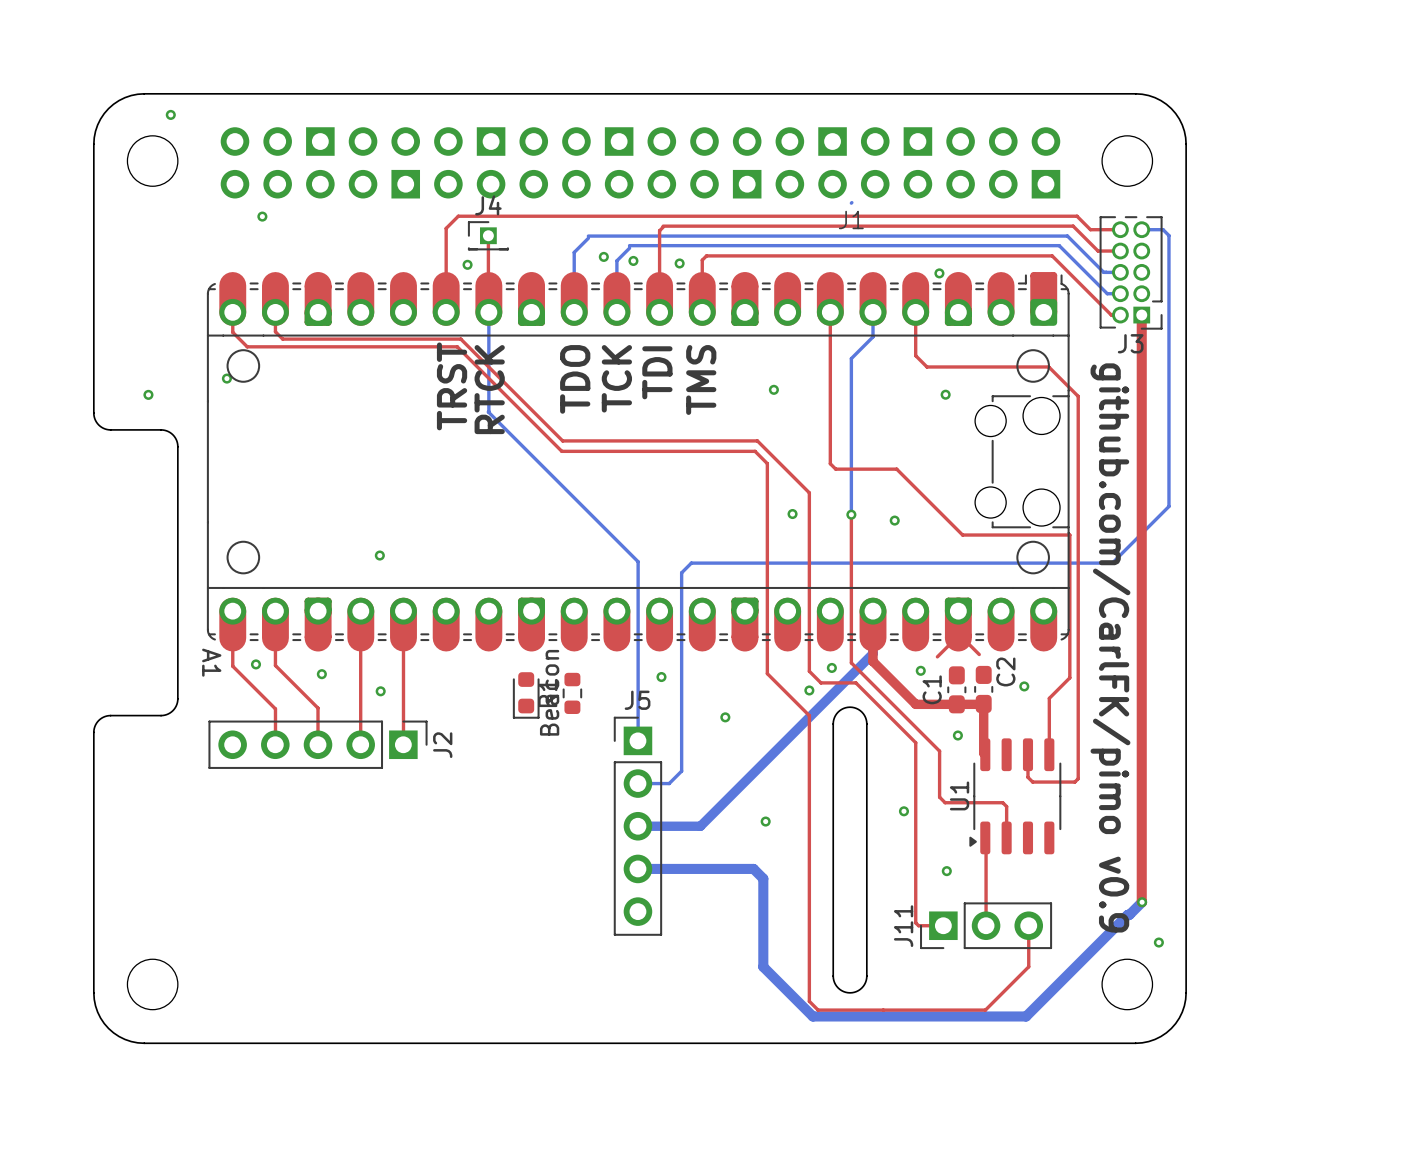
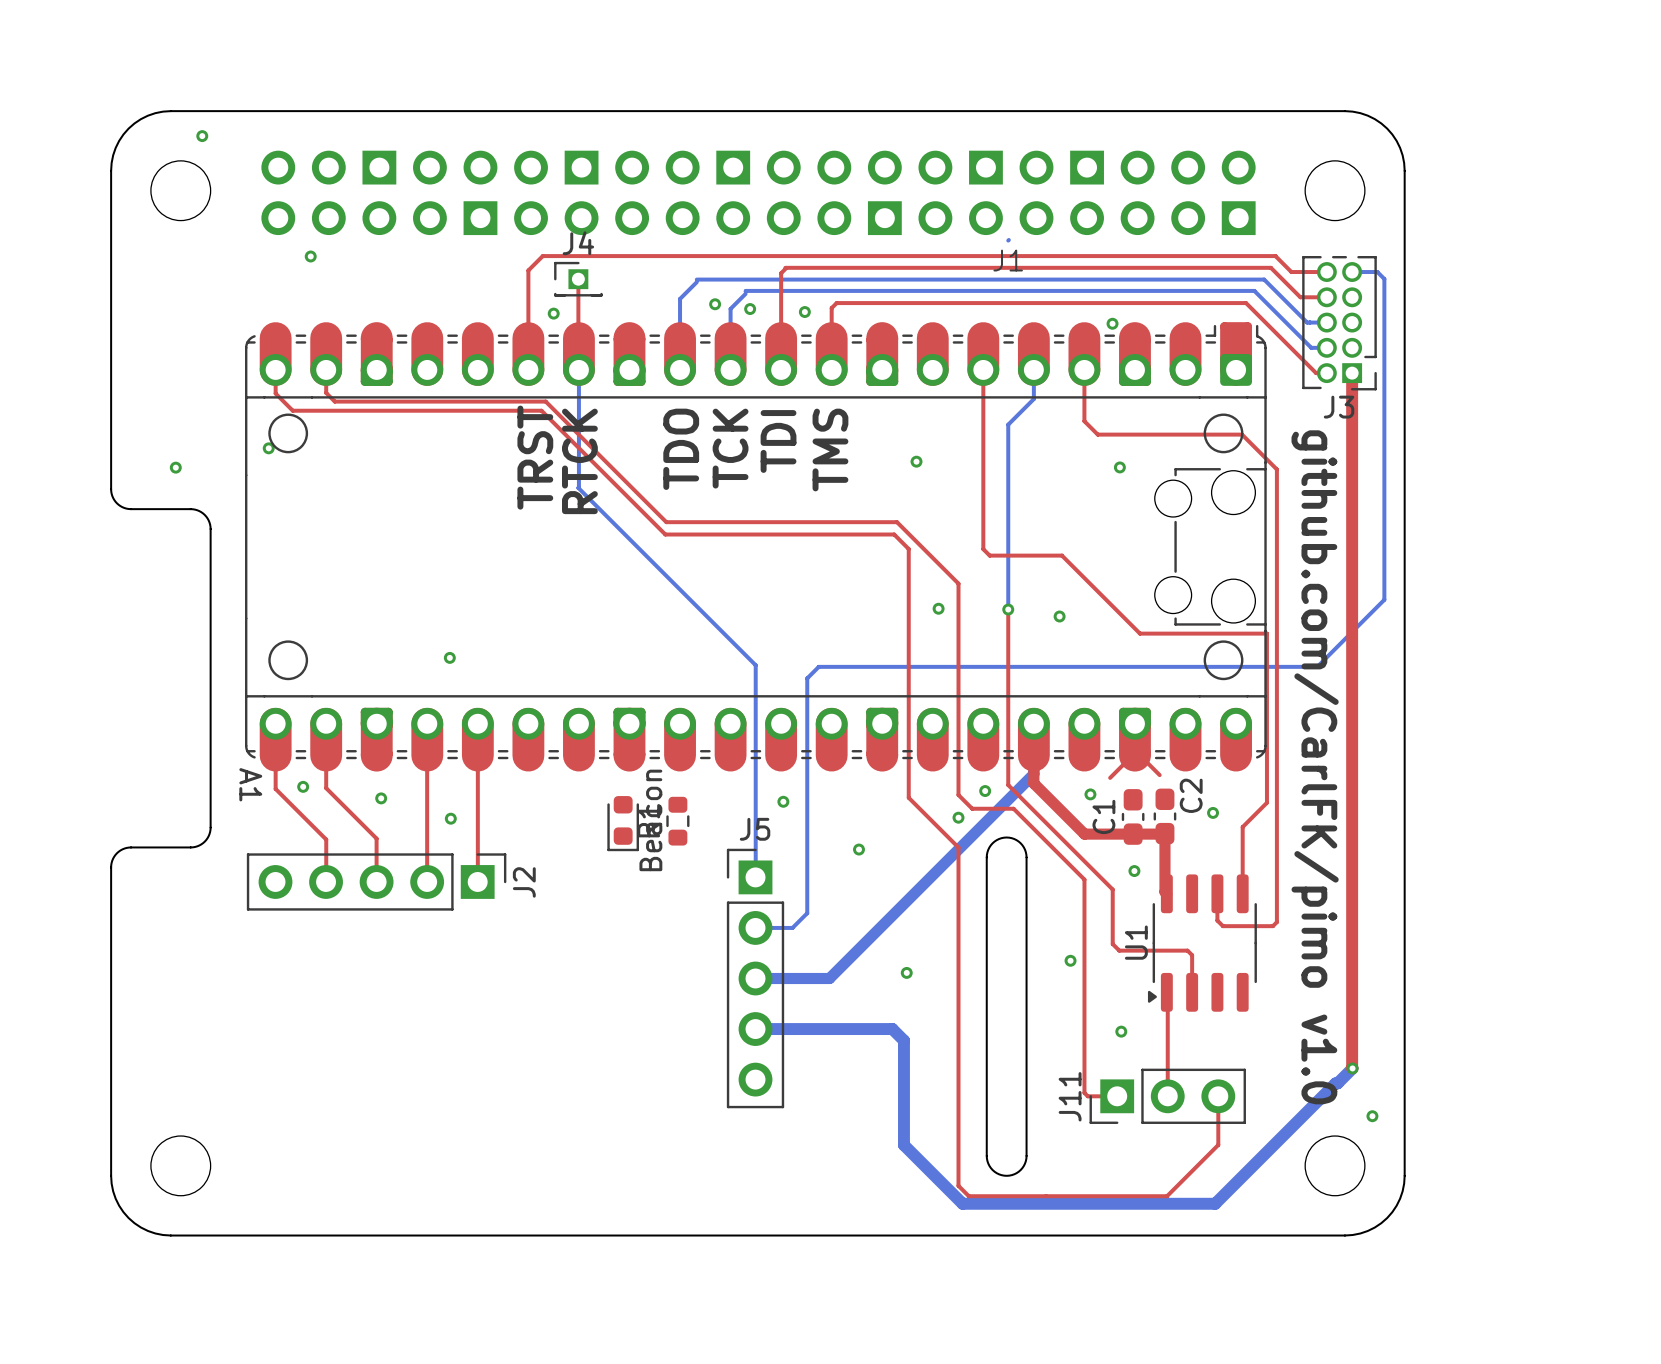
text: github.com/CarlFK/pimo v0.9 (1110, 647) -> github.com/CarlFK/pimo v1.0 (1315, 767)

